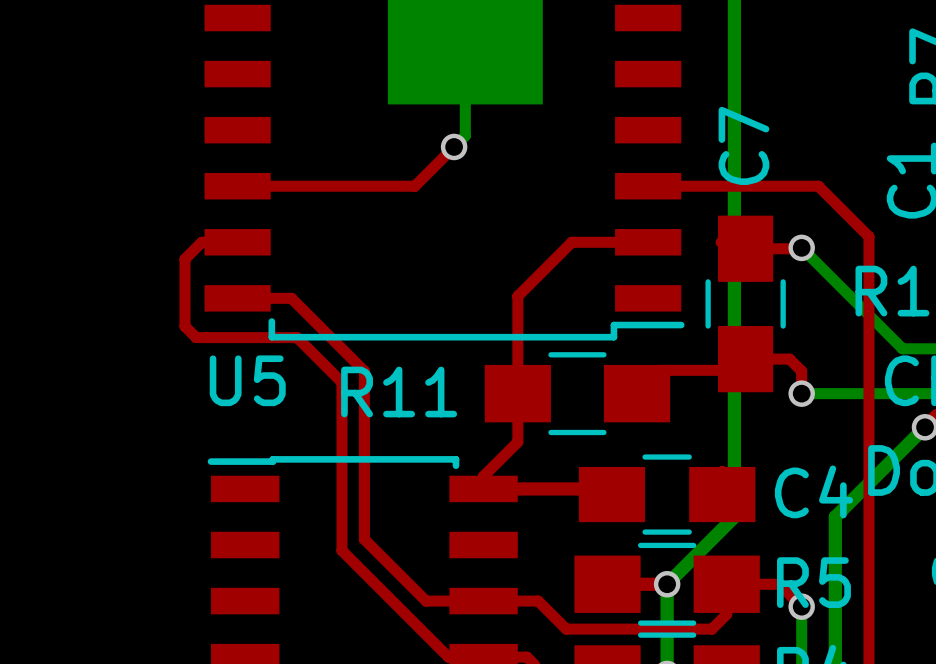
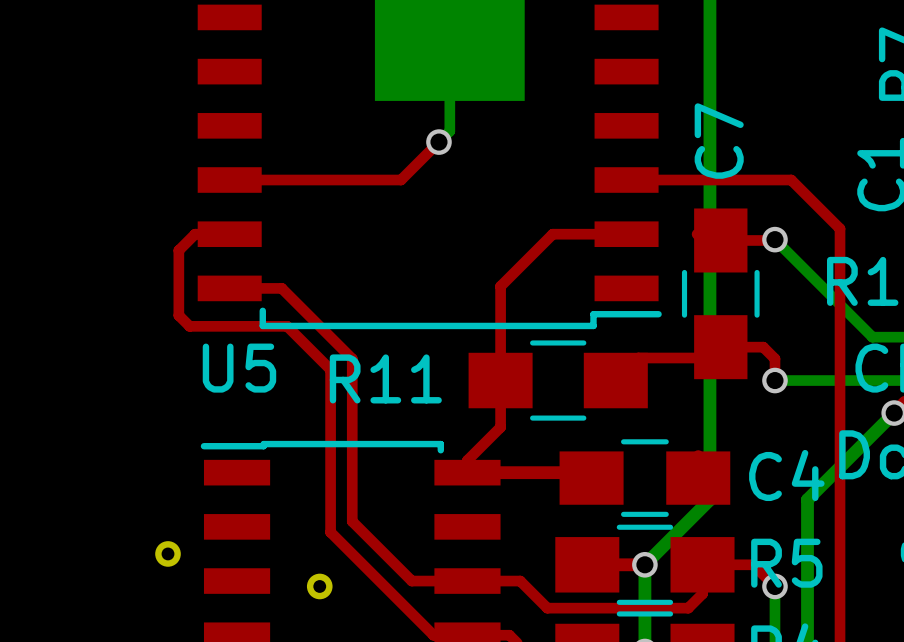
part: none -> (168, 553)
part: none -> (319, 586)

